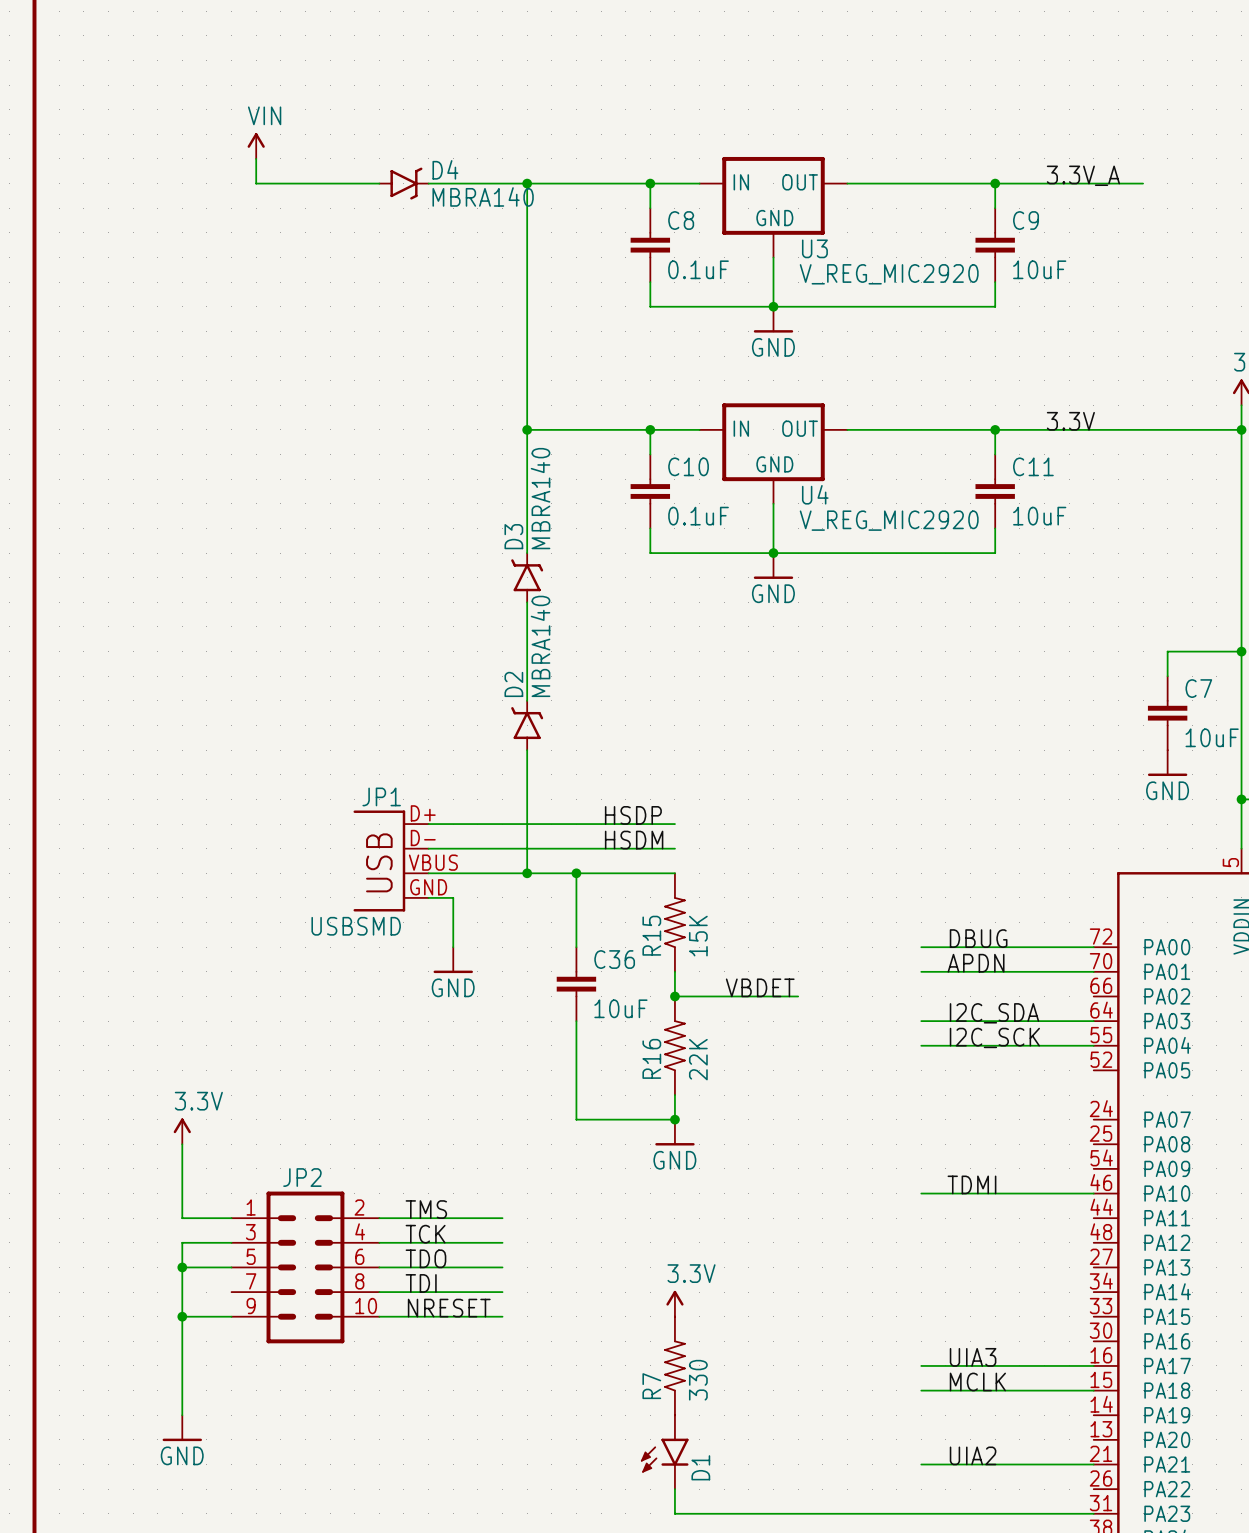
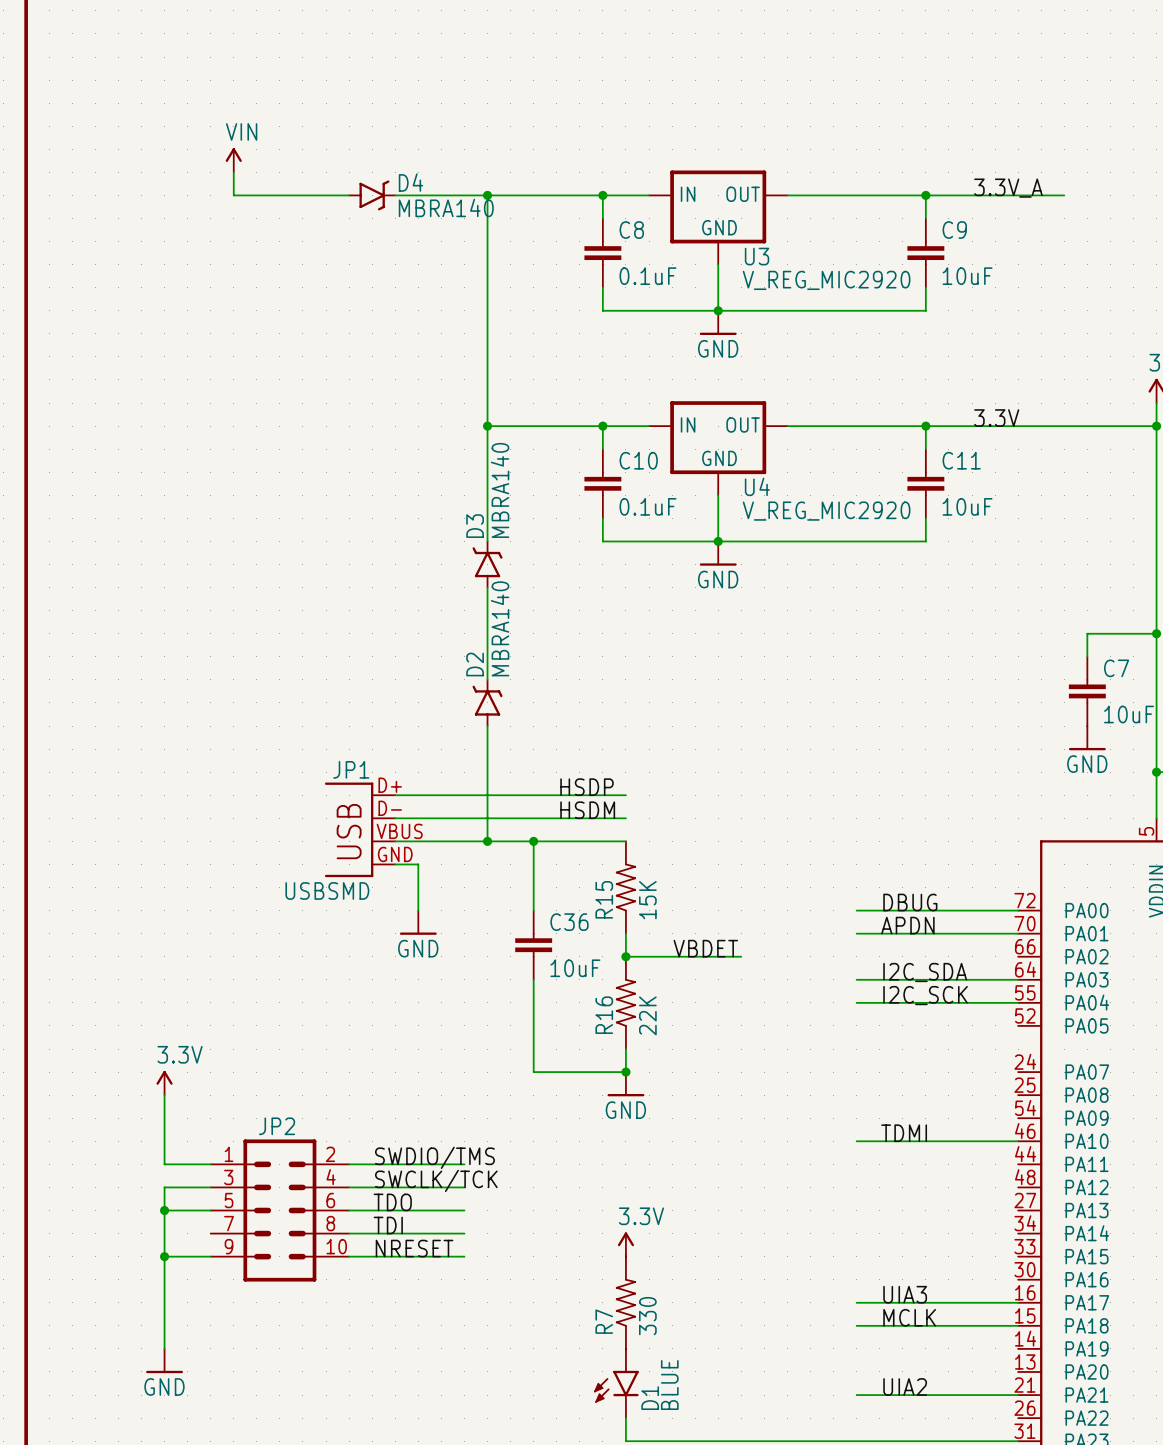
label: TMS (426, 1209) -> SWDIO/TMS (434, 1157)
label: TCK (425, 1234) -> SWCLK/TCK (436, 1180)
D1 value: none -> BLUE (669, 1384)

